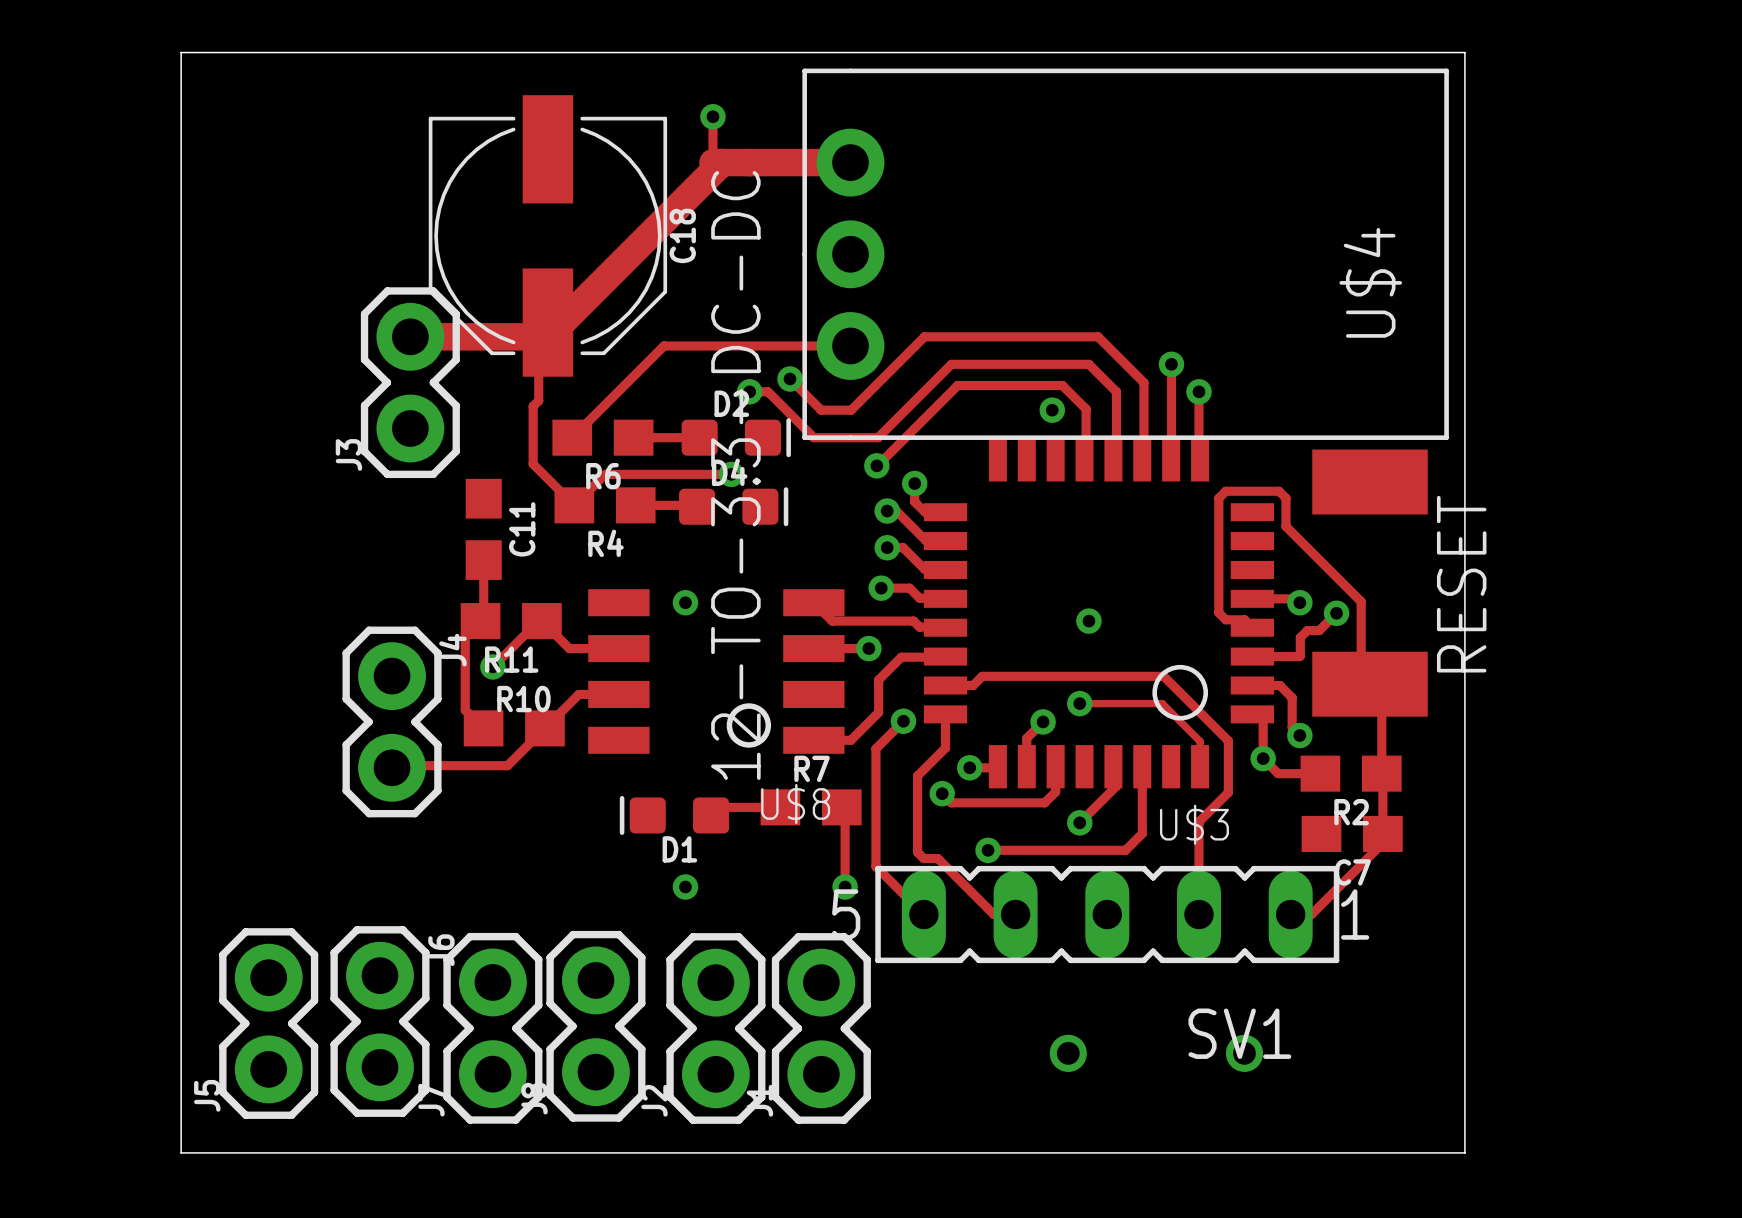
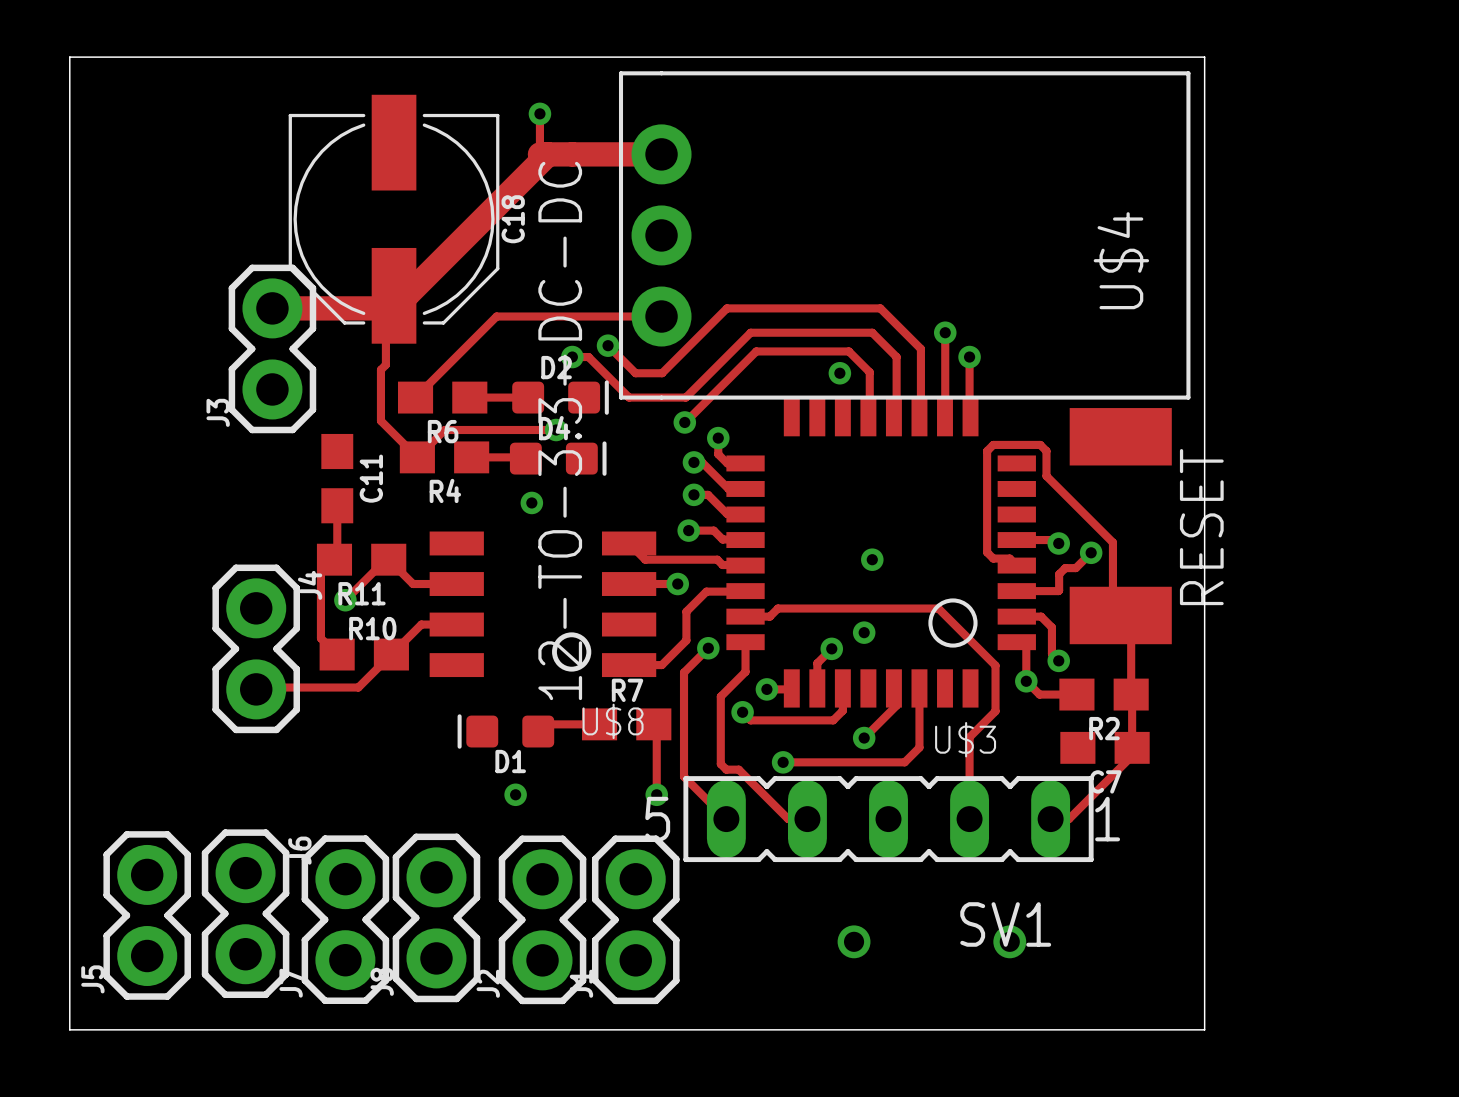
via position: (685, 602) -> (531, 502)
track: (1079, 703) (1162, 703) (1200, 741) (1200, 766) -> none

